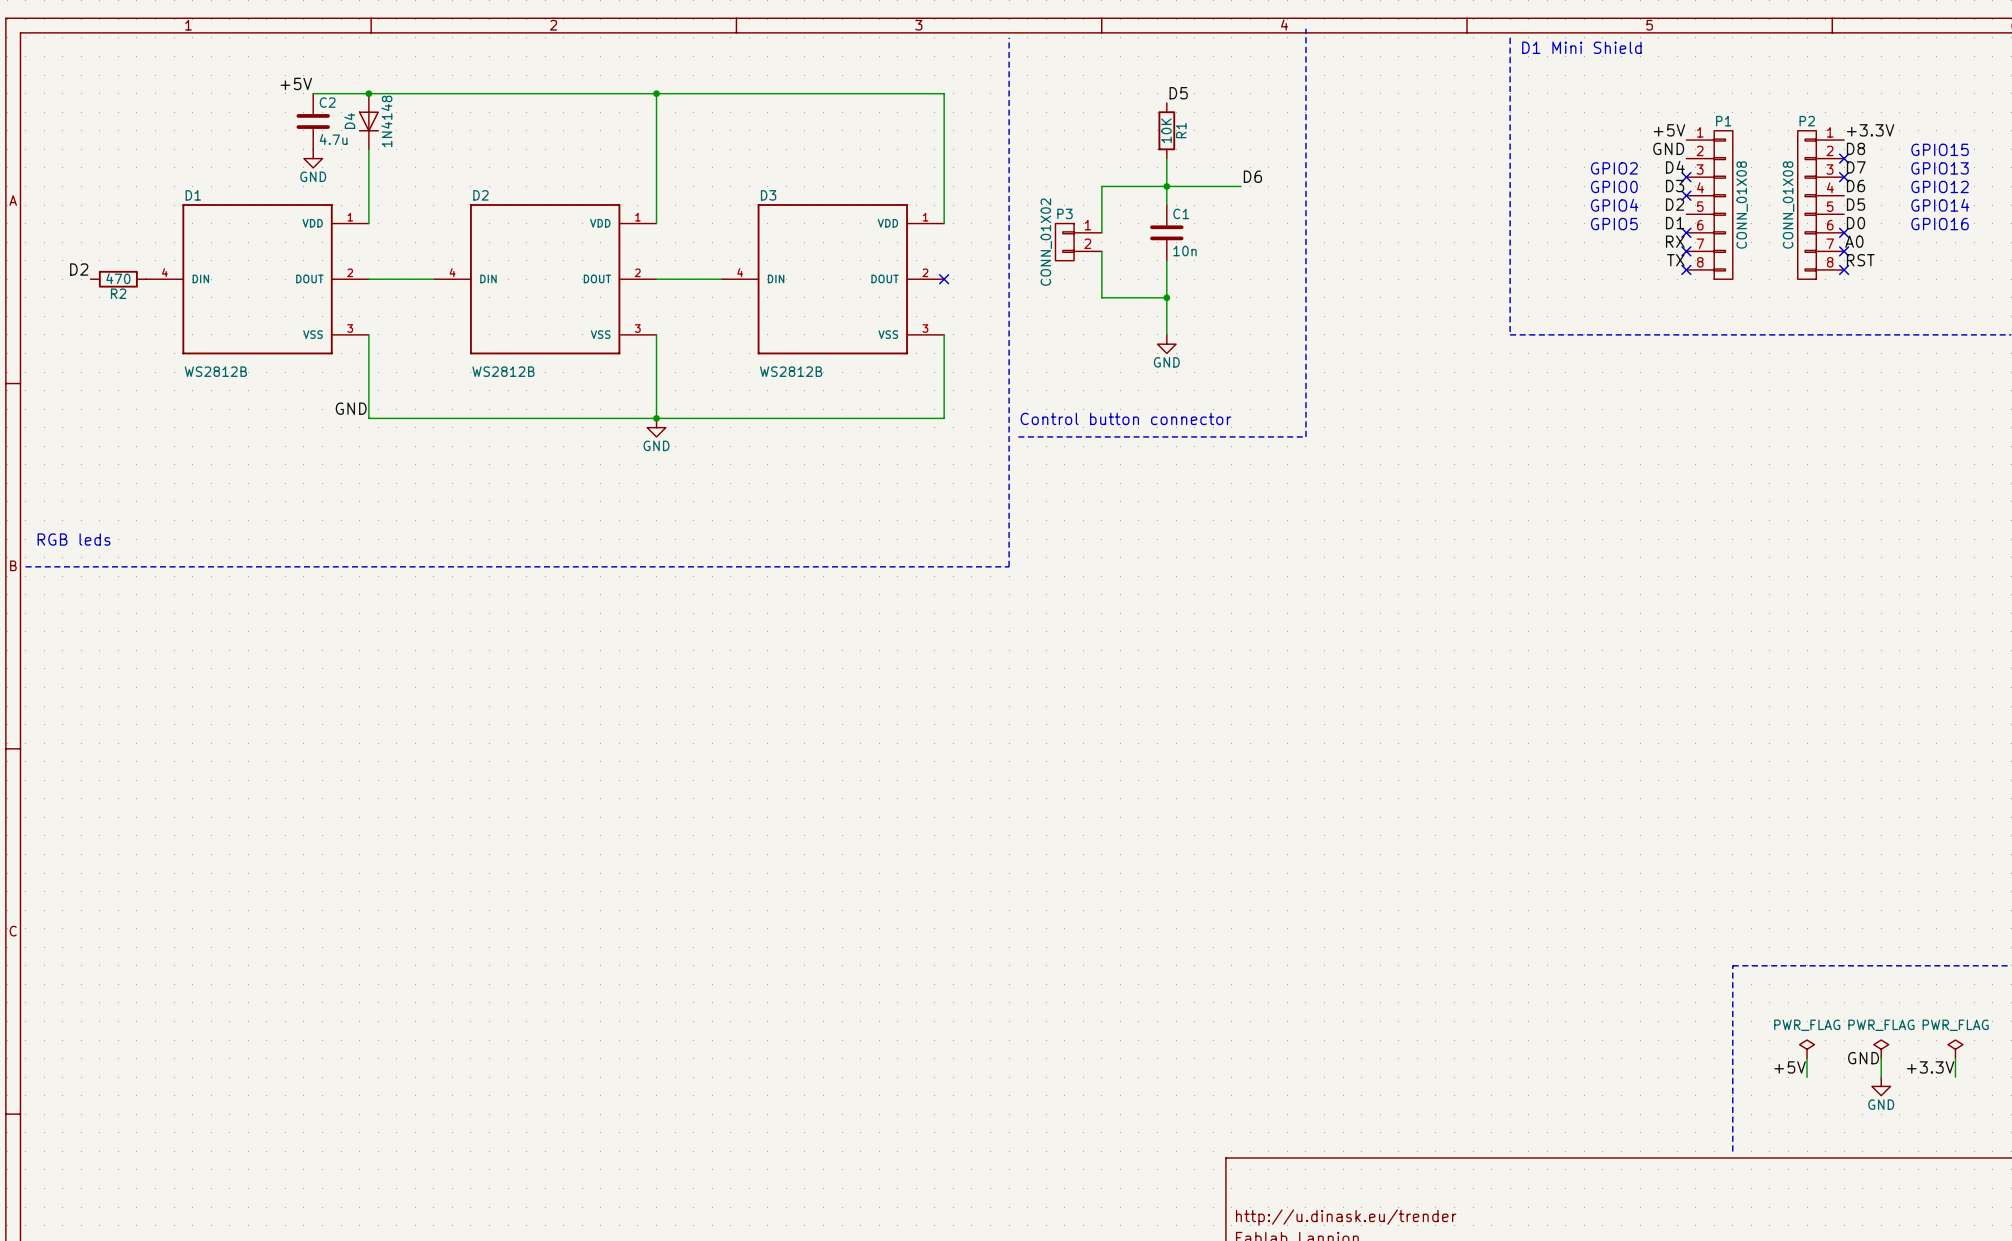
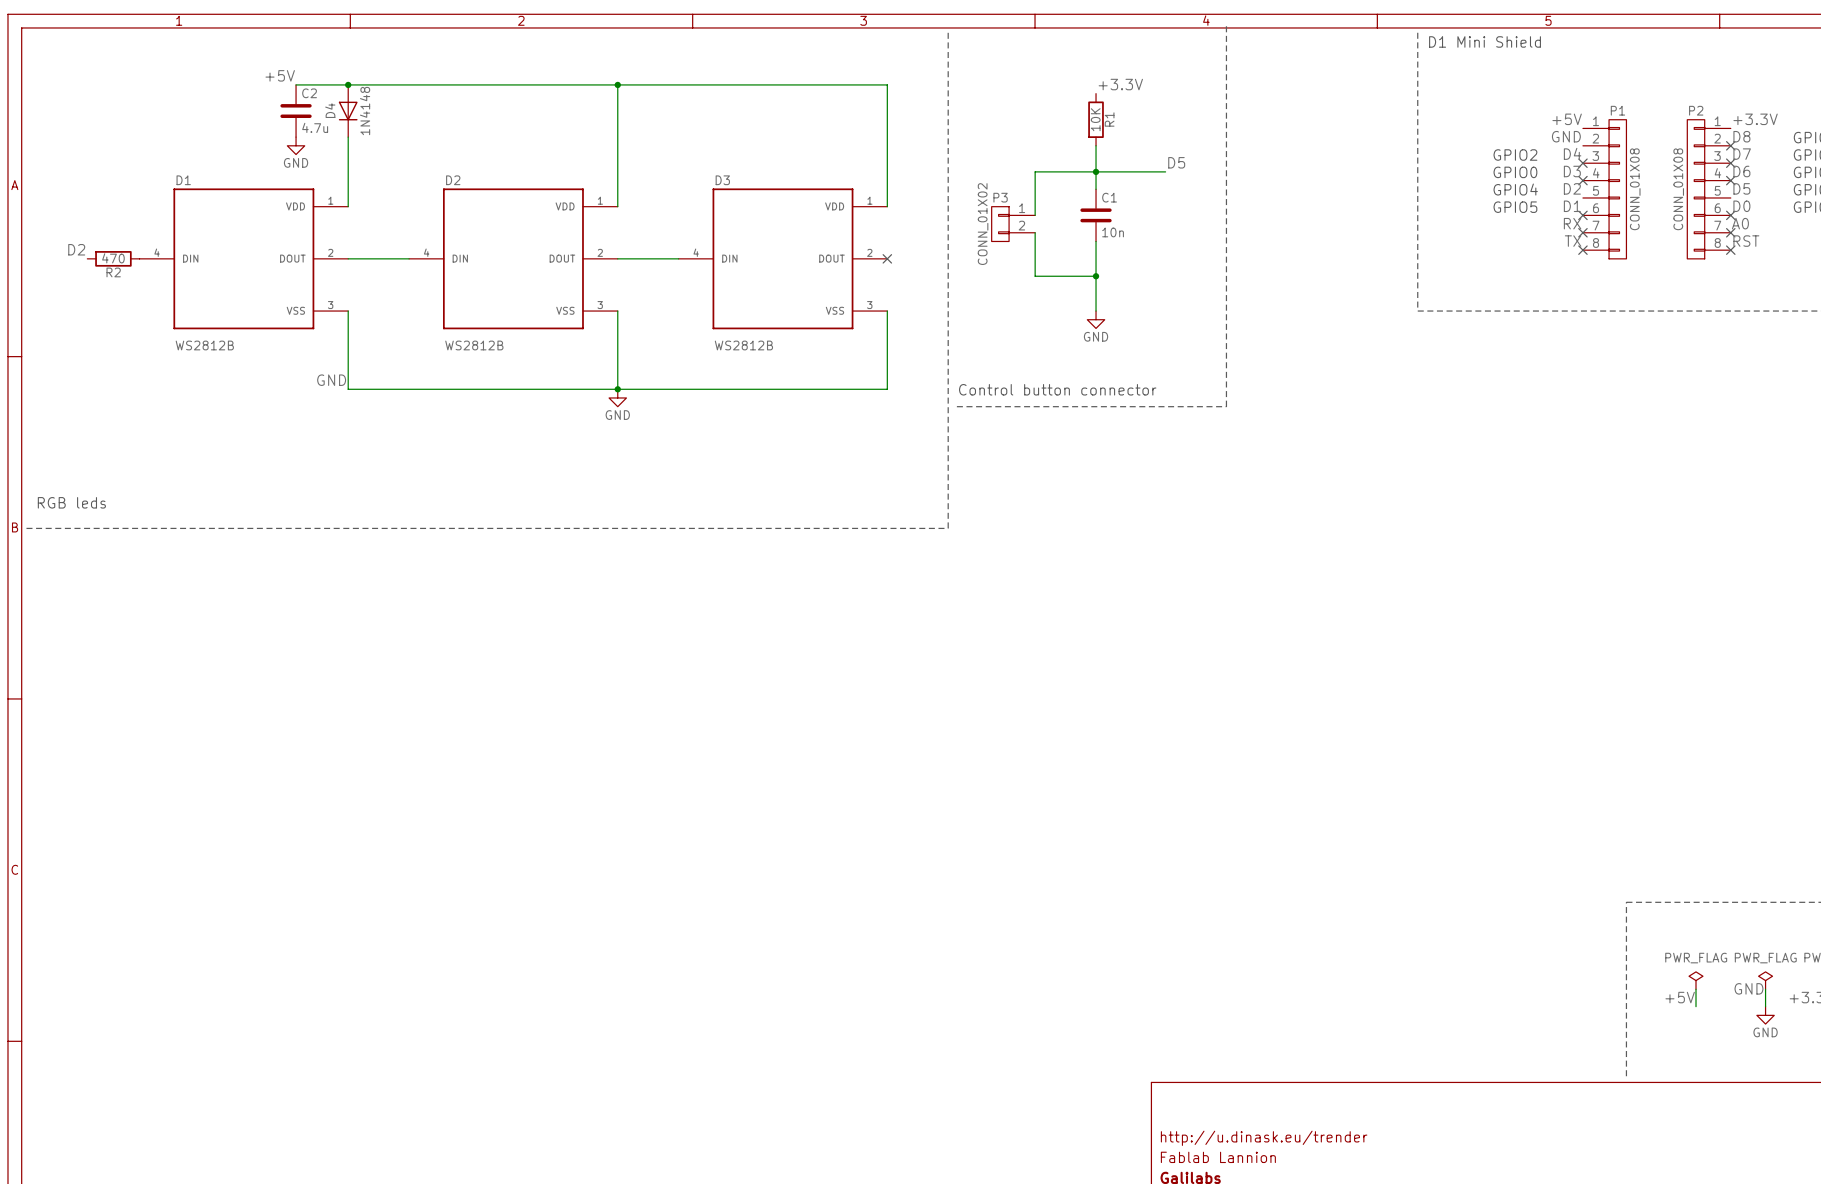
label: D5 (1178, 93) -> +3.3V (1120, 84)
label: D6 (1252, 176) -> D5 (1176, 162)
no-connect mark: none -> (1730, 180)

